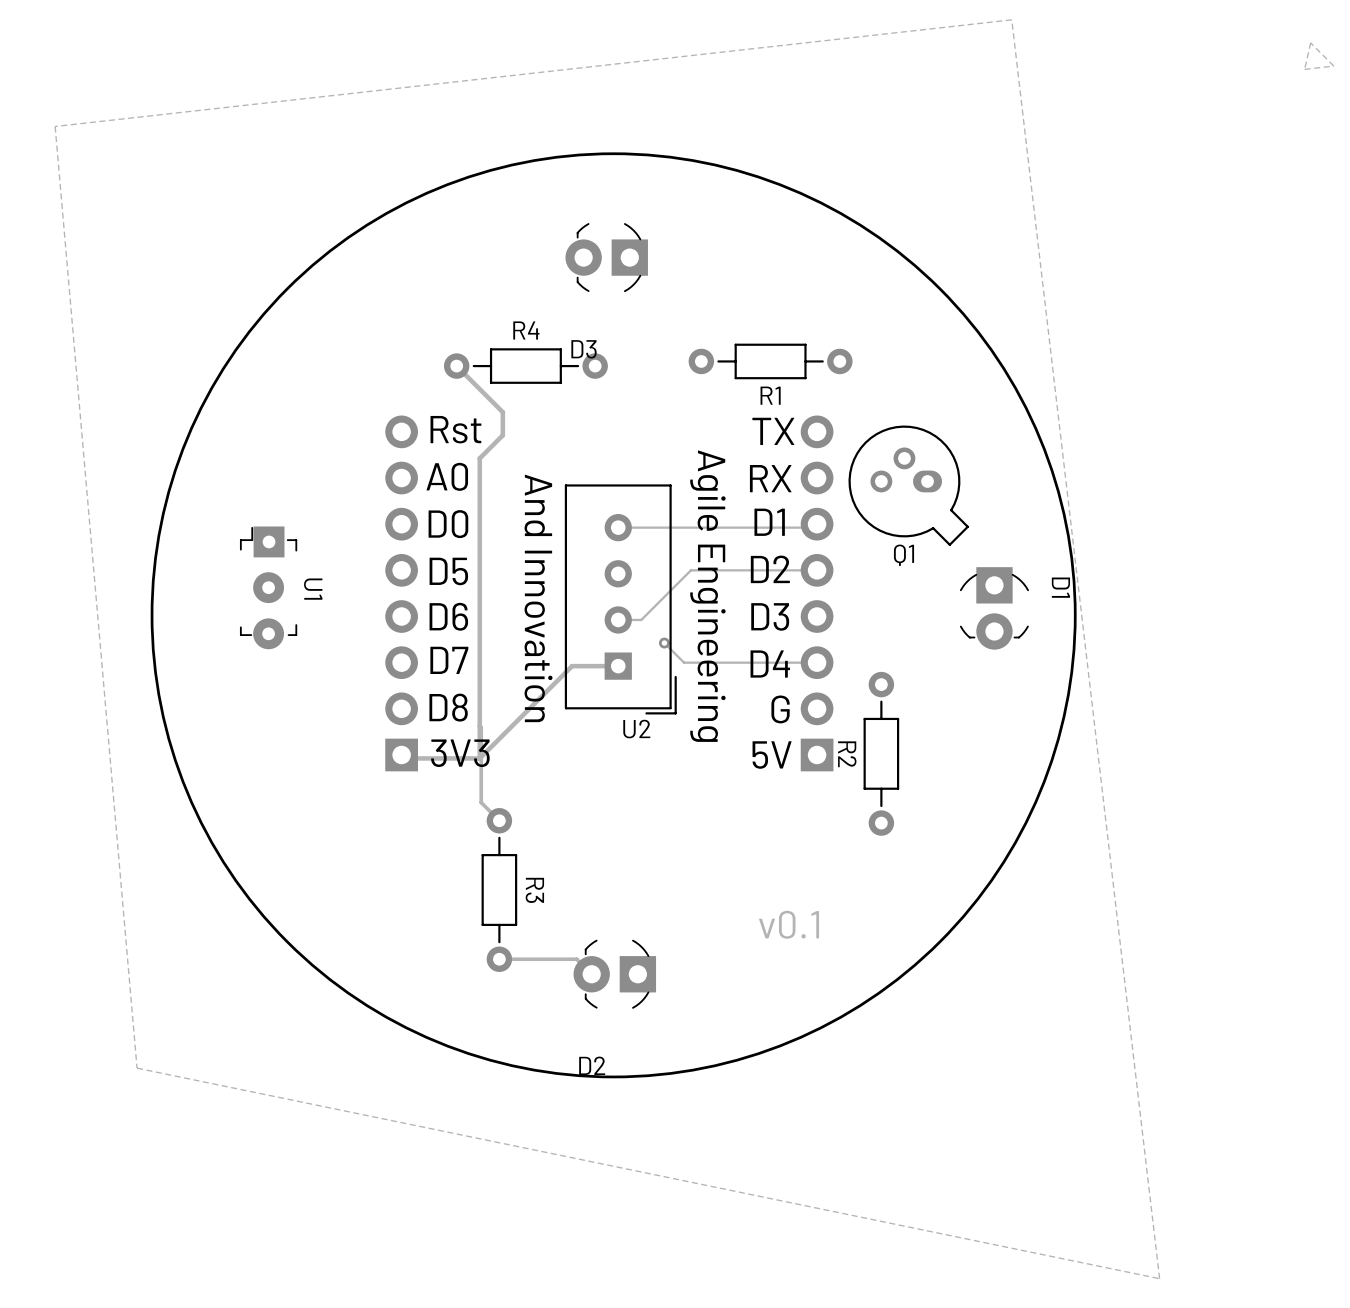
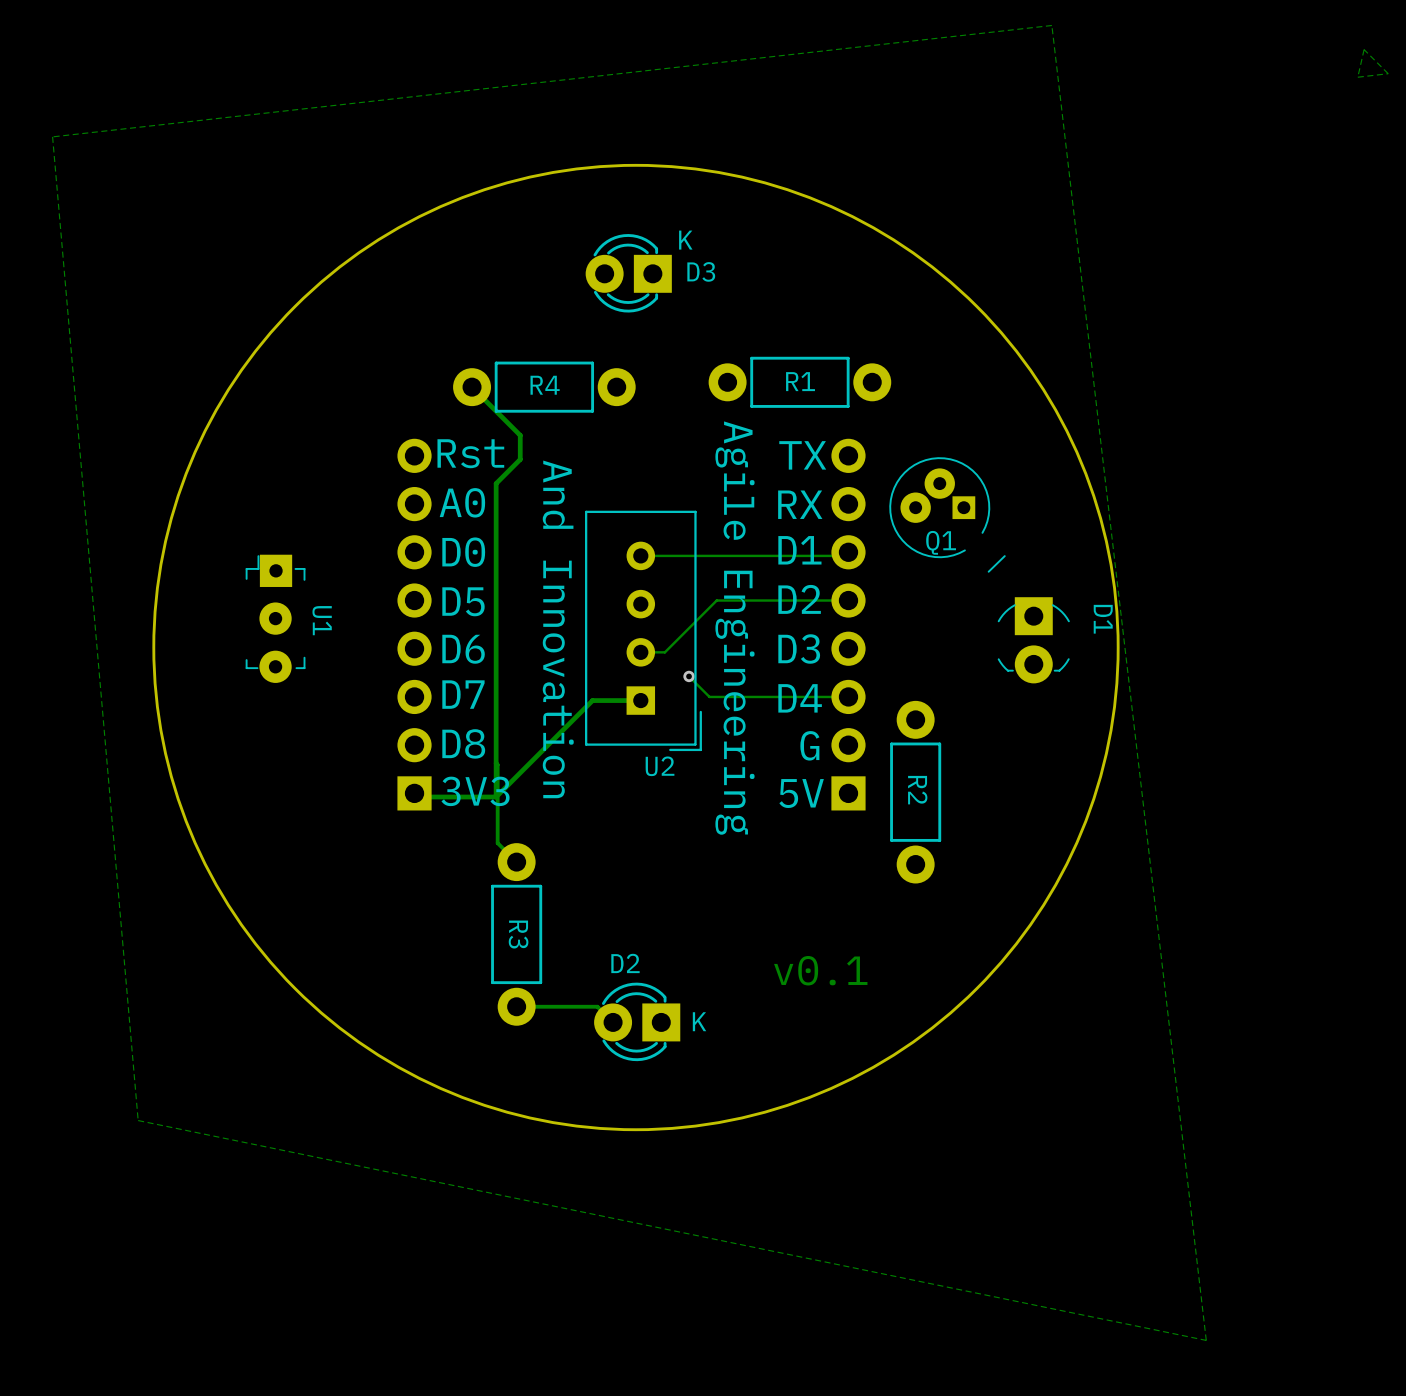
D3 footprint: [565, 223, 648, 293] -> [585, 234, 672, 313]
R4 name position: R4 (526, 330) -> R4 (545, 385)
R1 footprint: [688, 343, 853, 380] -> [708, 356, 892, 408]
R4 footprint: [443, 348, 608, 384] -> [453, 361, 636, 413]
D3 name position: D3 (584, 349) -> D3 (701, 271)
R1 name position: R1 (770, 395) -> R1 (800, 381)
Q1 footprint: [848, 425, 969, 546] -> [889, 457, 1006, 573]
Q1 name position: Q1 (904, 555) -> Q1 (941, 542)
R2 footprint: [863, 671, 900, 836] -> [890, 700, 942, 884]
R2 name position: R2 (847, 754) -> R2 (917, 790)
R3 footprint: [481, 808, 518, 972] -> [491, 843, 543, 1026]
R3 name position: R3 (534, 890) -> R3 (518, 934)
D2 footprint: [573, 939, 657, 1009] -> [594, 982, 681, 1062]
D2 name position: D2 (592, 1065) -> D2 (625, 963)

